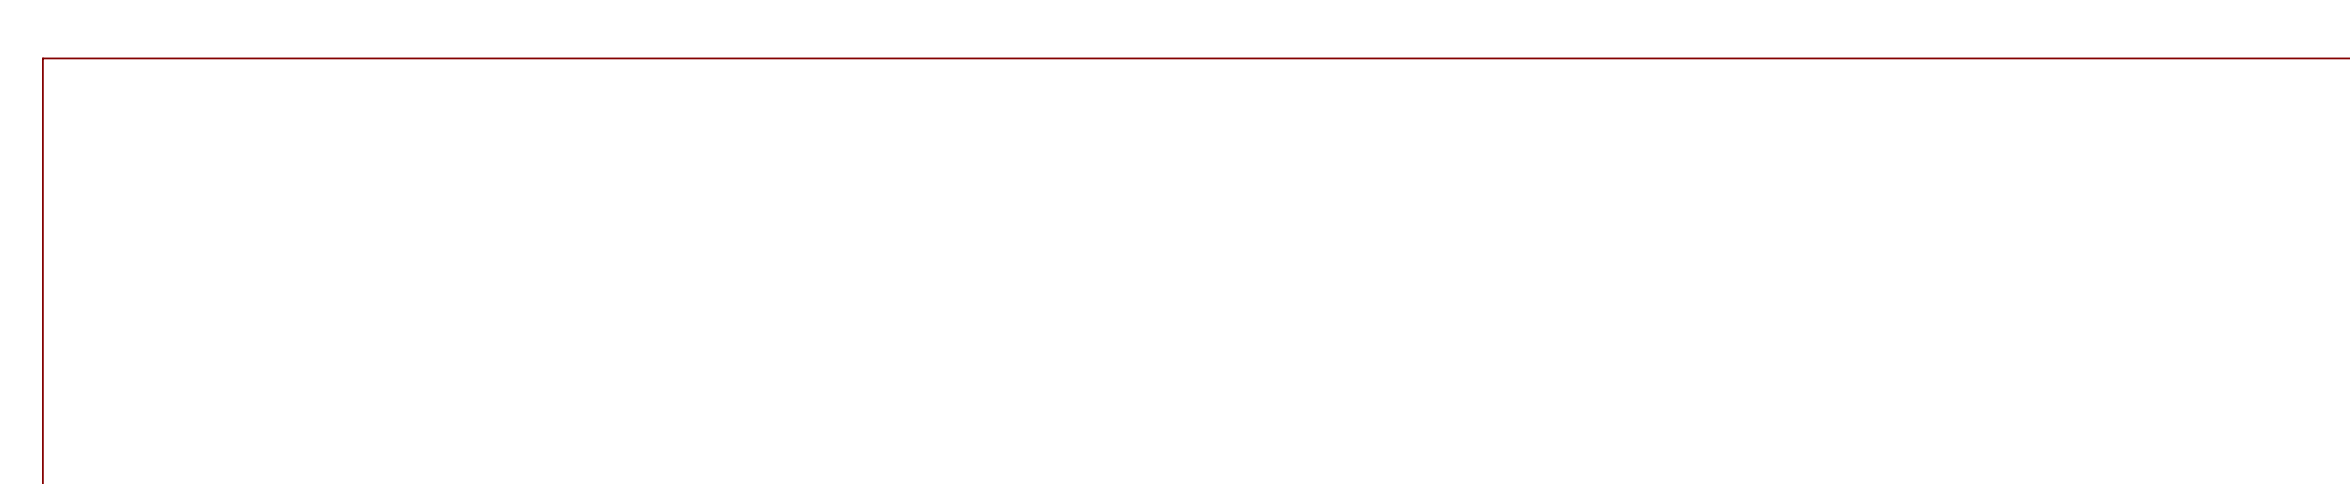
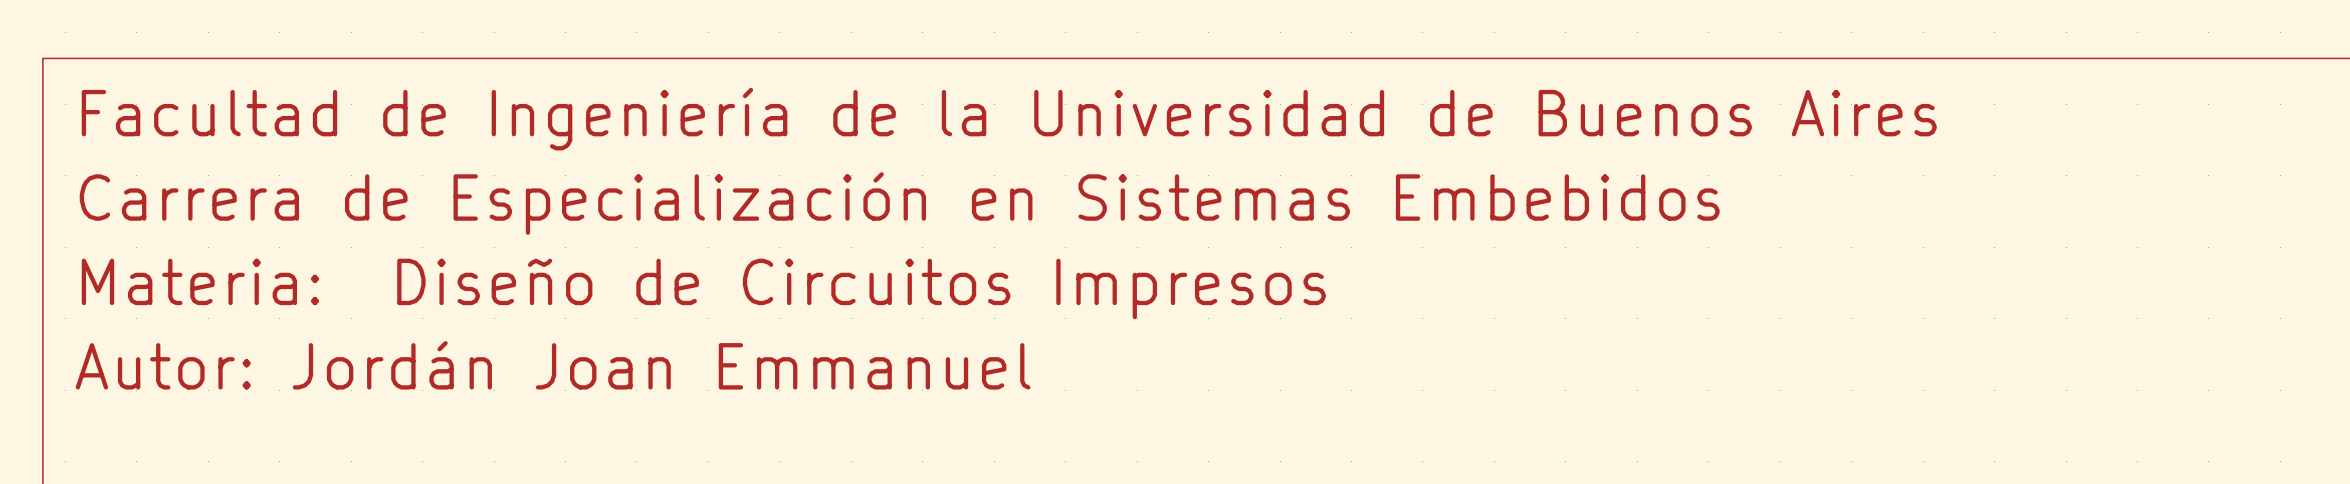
title block: none -> Facultad de Ingeniería de la Universidad de Buenos Aires (1009, 119)
title block: none -> Carrera de Especialización en Sistemas Embebidos (899, 203)
title block: none -> Materia: Diseño de Circuitos Impresos (703, 288)
title block: none -> Autor: Jordán Joan Emmanuel (553, 365)

